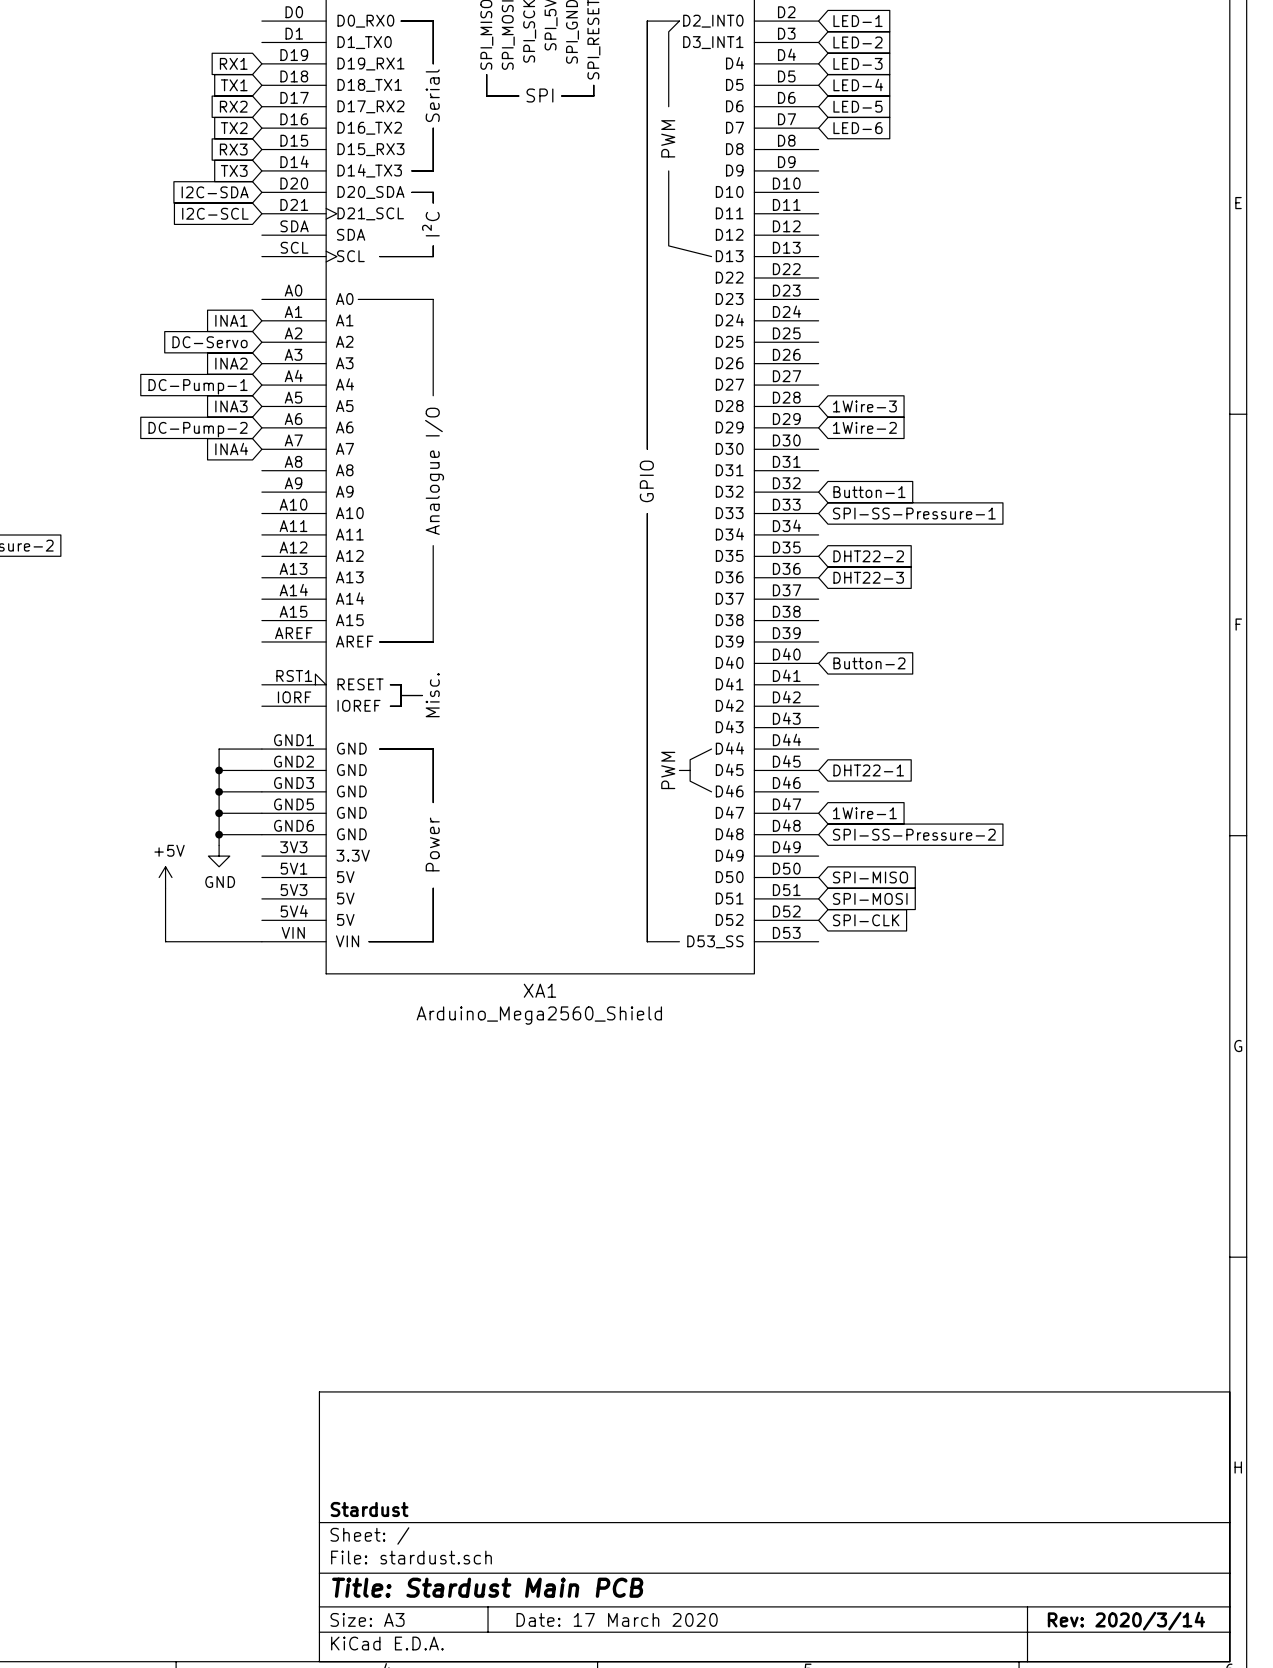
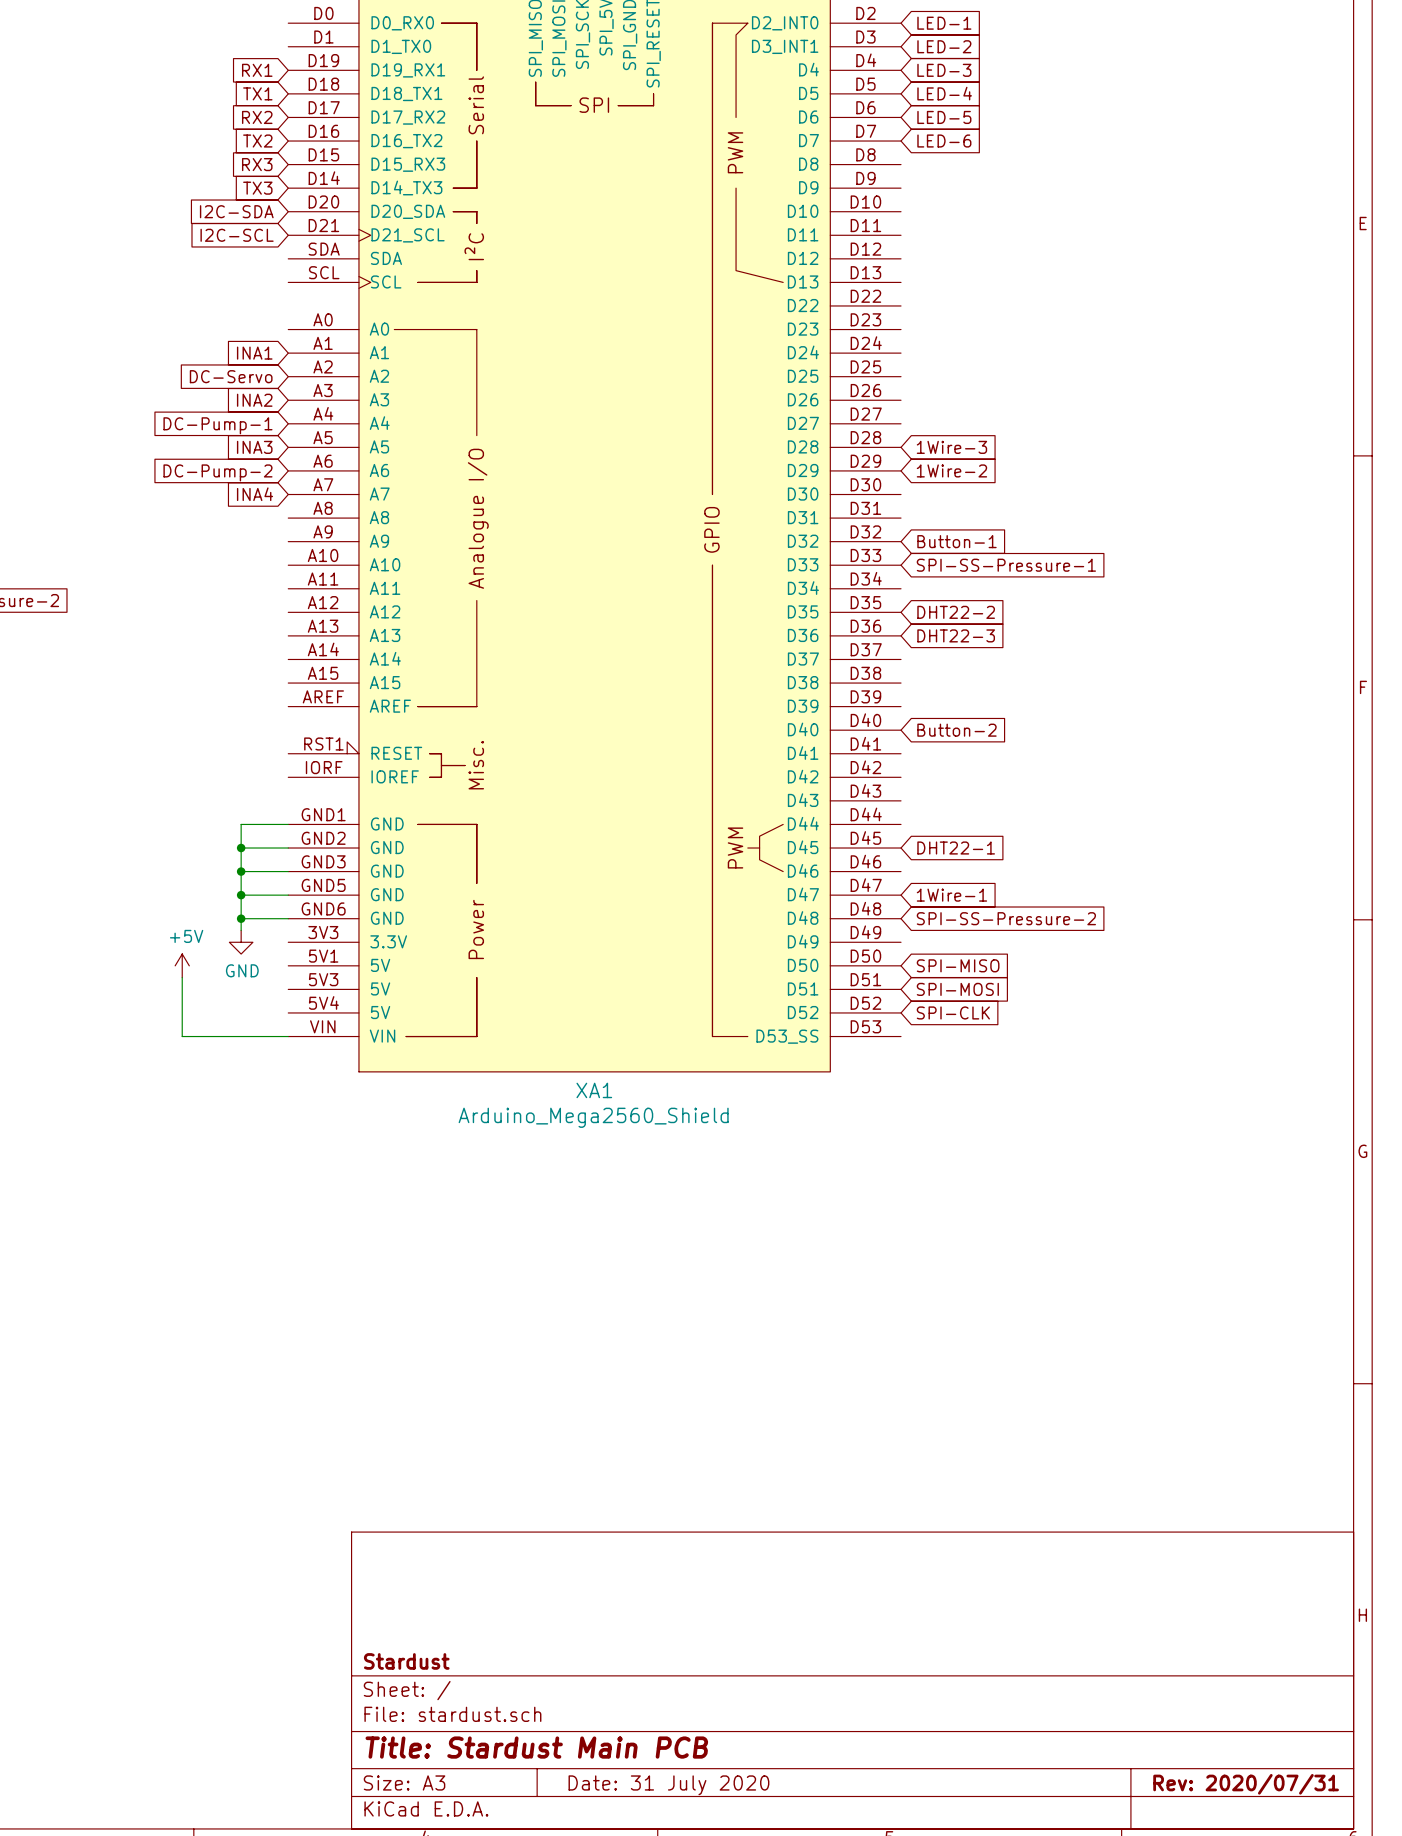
title block: Date: 17 March 2020 (617, 1619) -> Date: 31 July 2020 (668, 1785)
title block: Rev: 2020/3/14 (1126, 1621) -> Rev: 2020/07/31 (1246, 1784)

